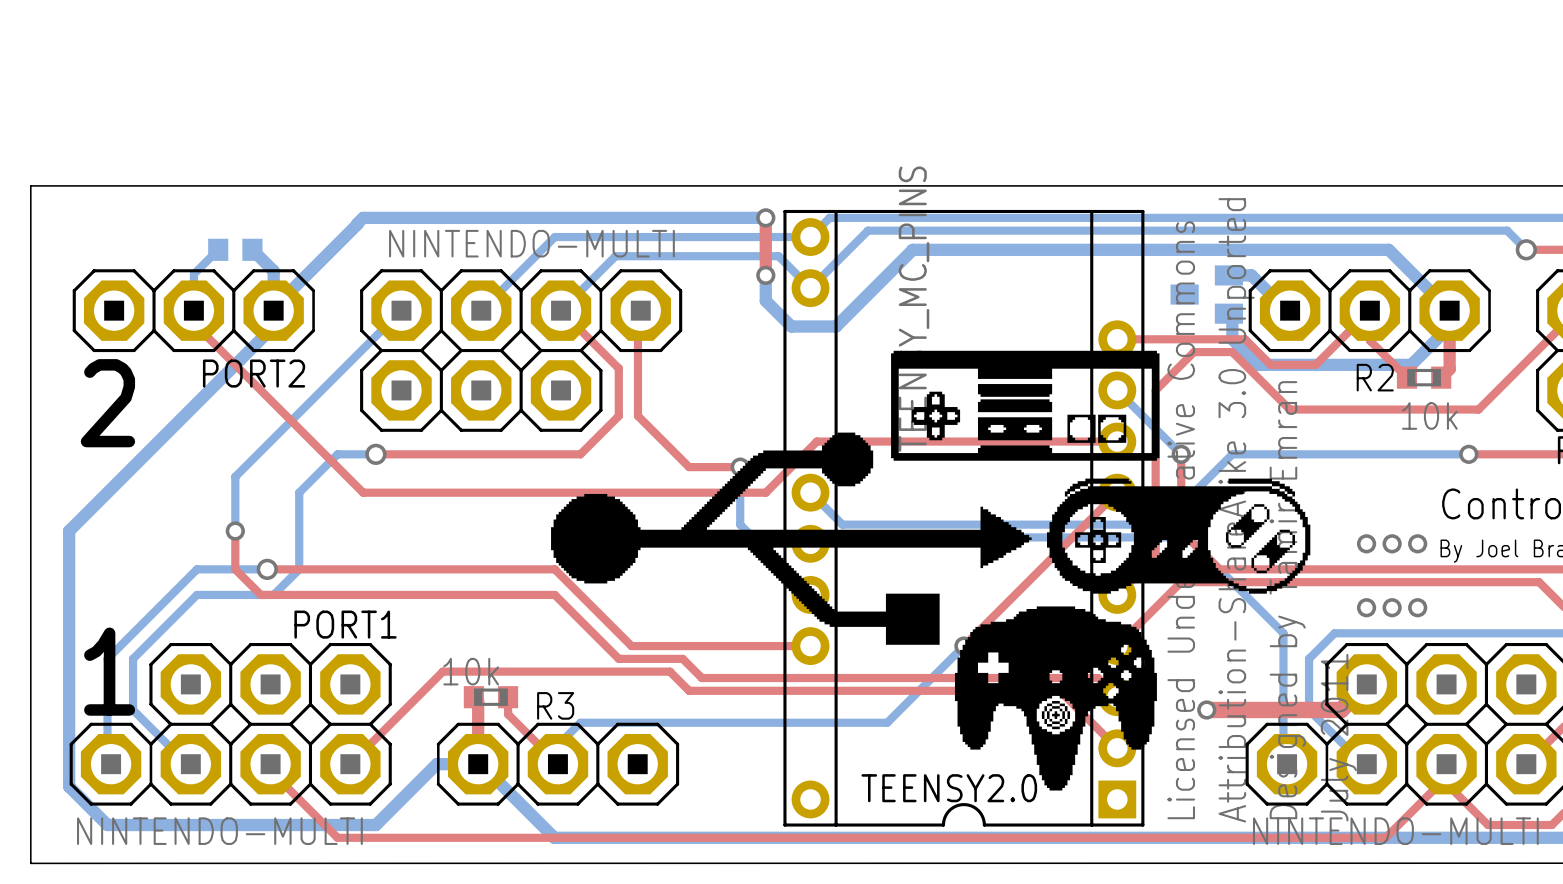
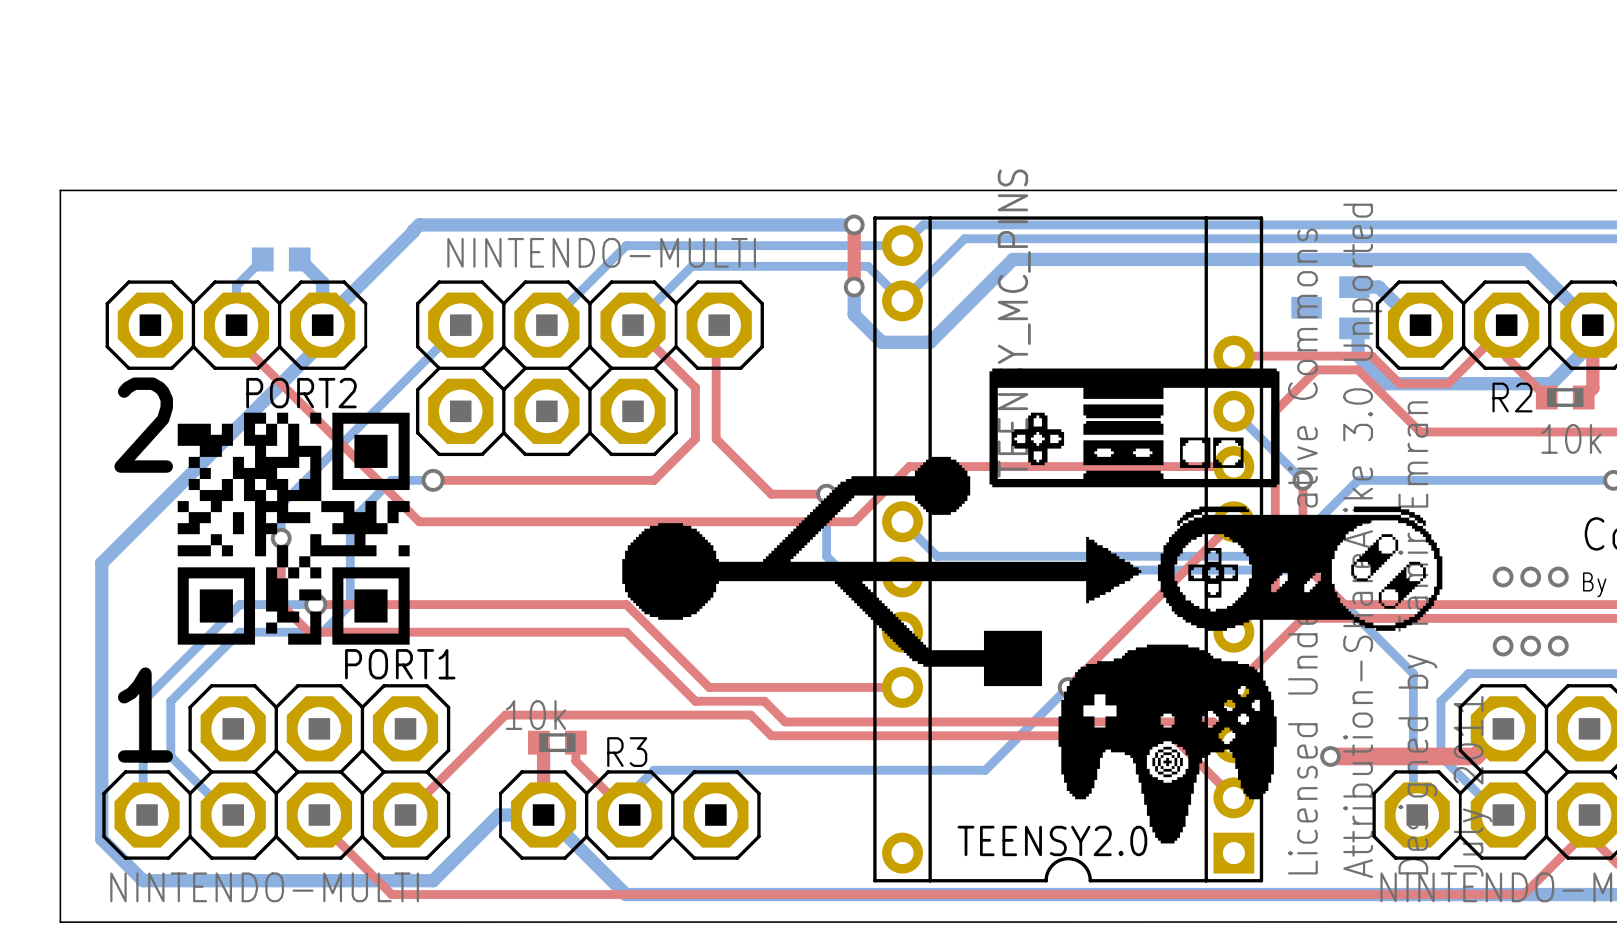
drawing: none -> [177, 412, 410, 645]
via position: (235, 531) -> (281, 538)

